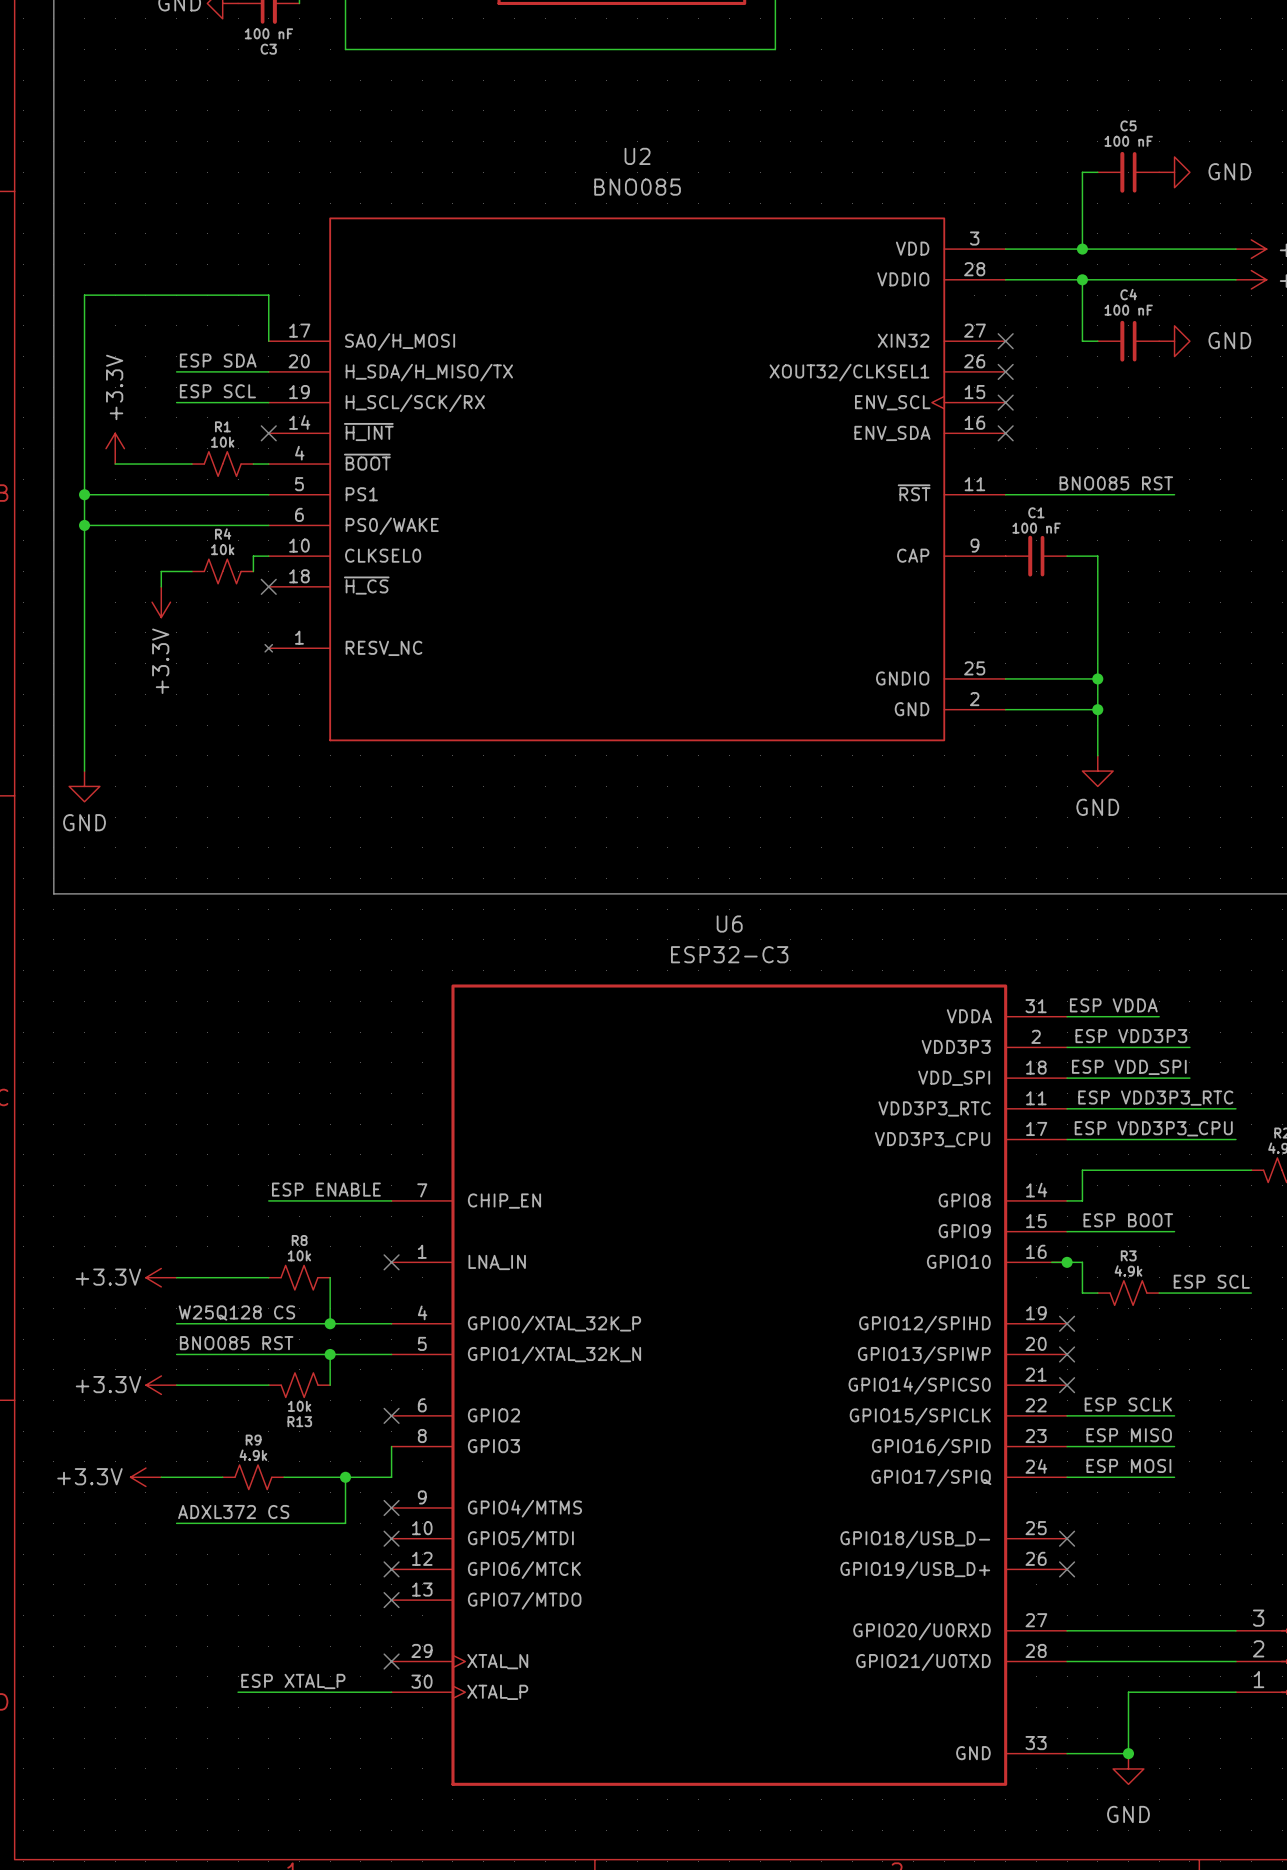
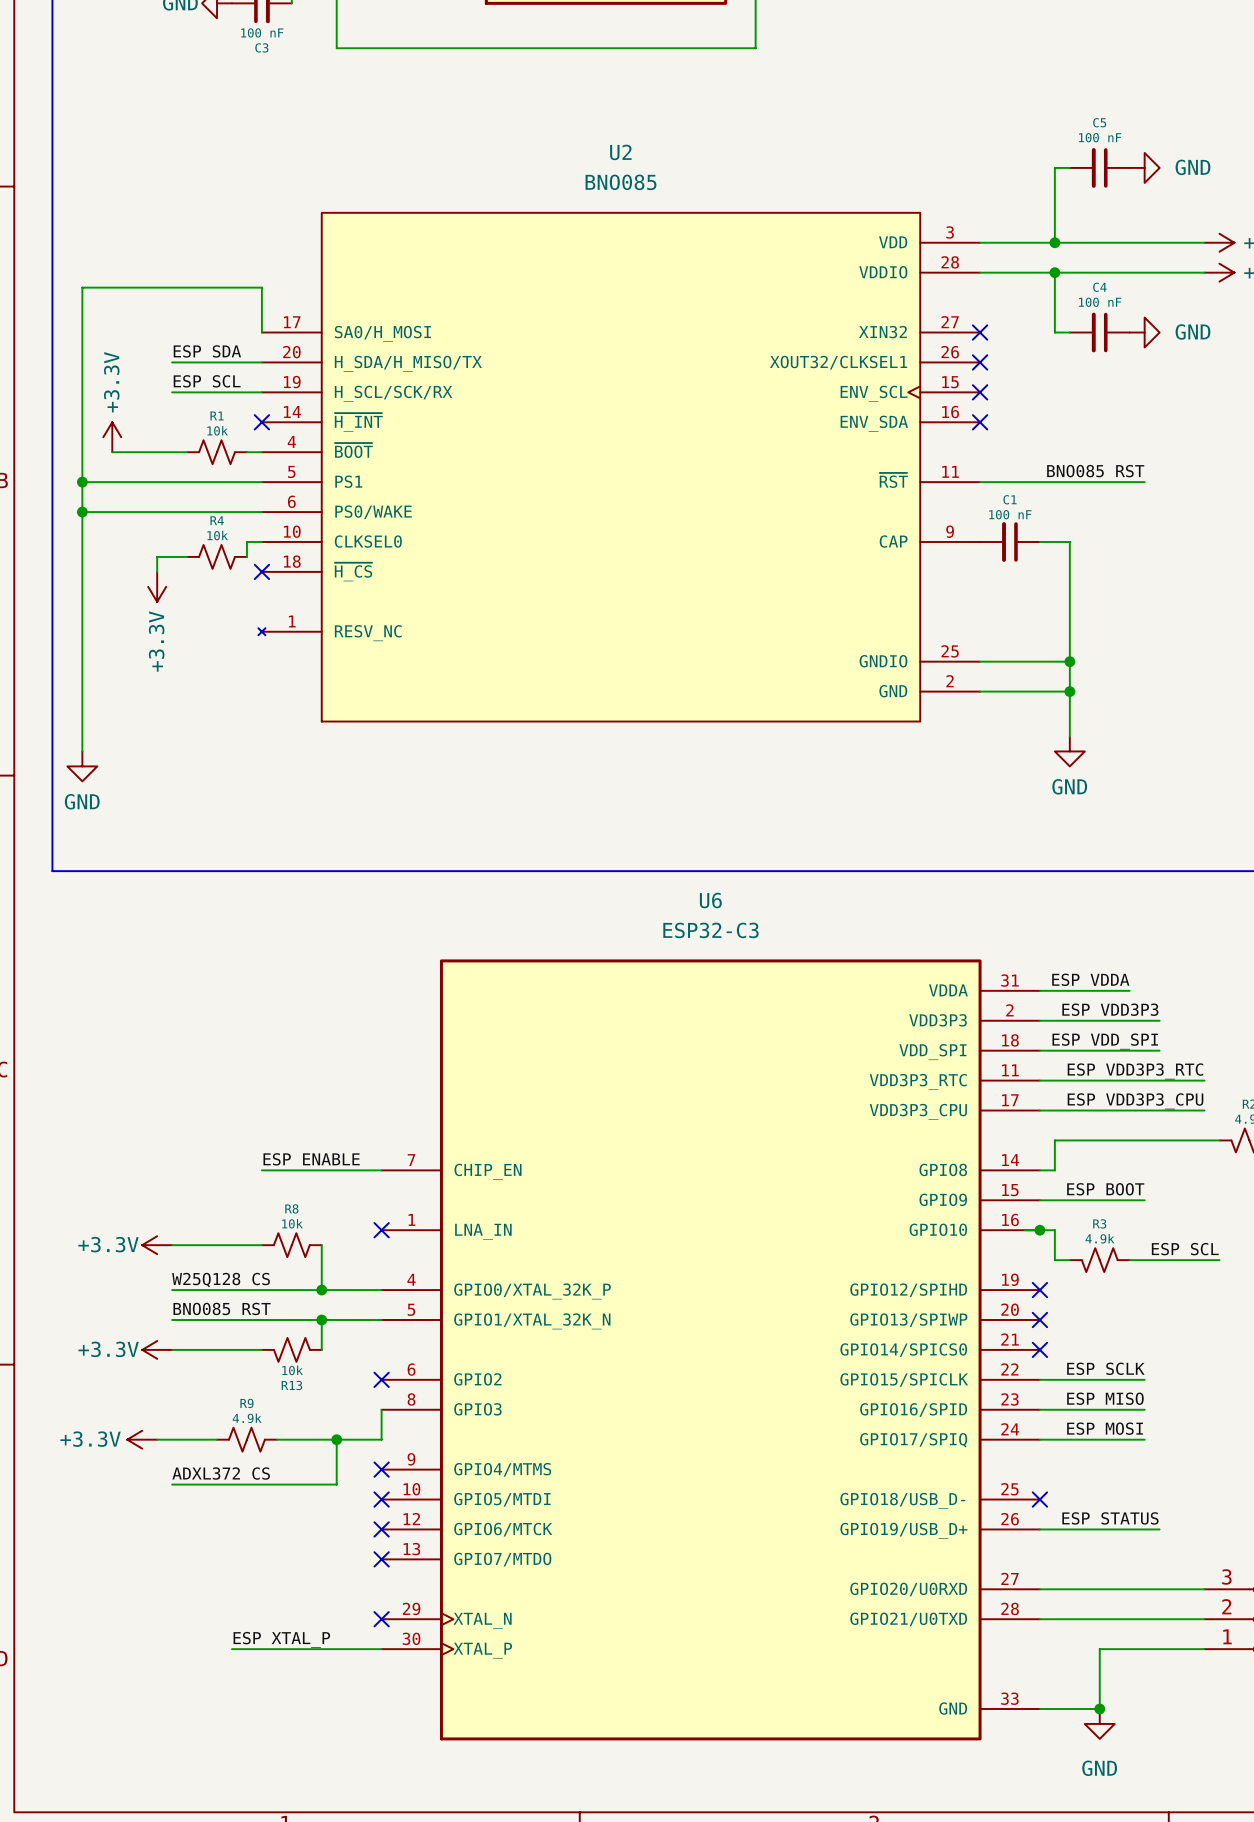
label: none -> ESP STATUS (1110, 1518)
wire: none -> (1039, 1529) (1159, 1529)
no-connect mark: (1067, 1569) -> none

